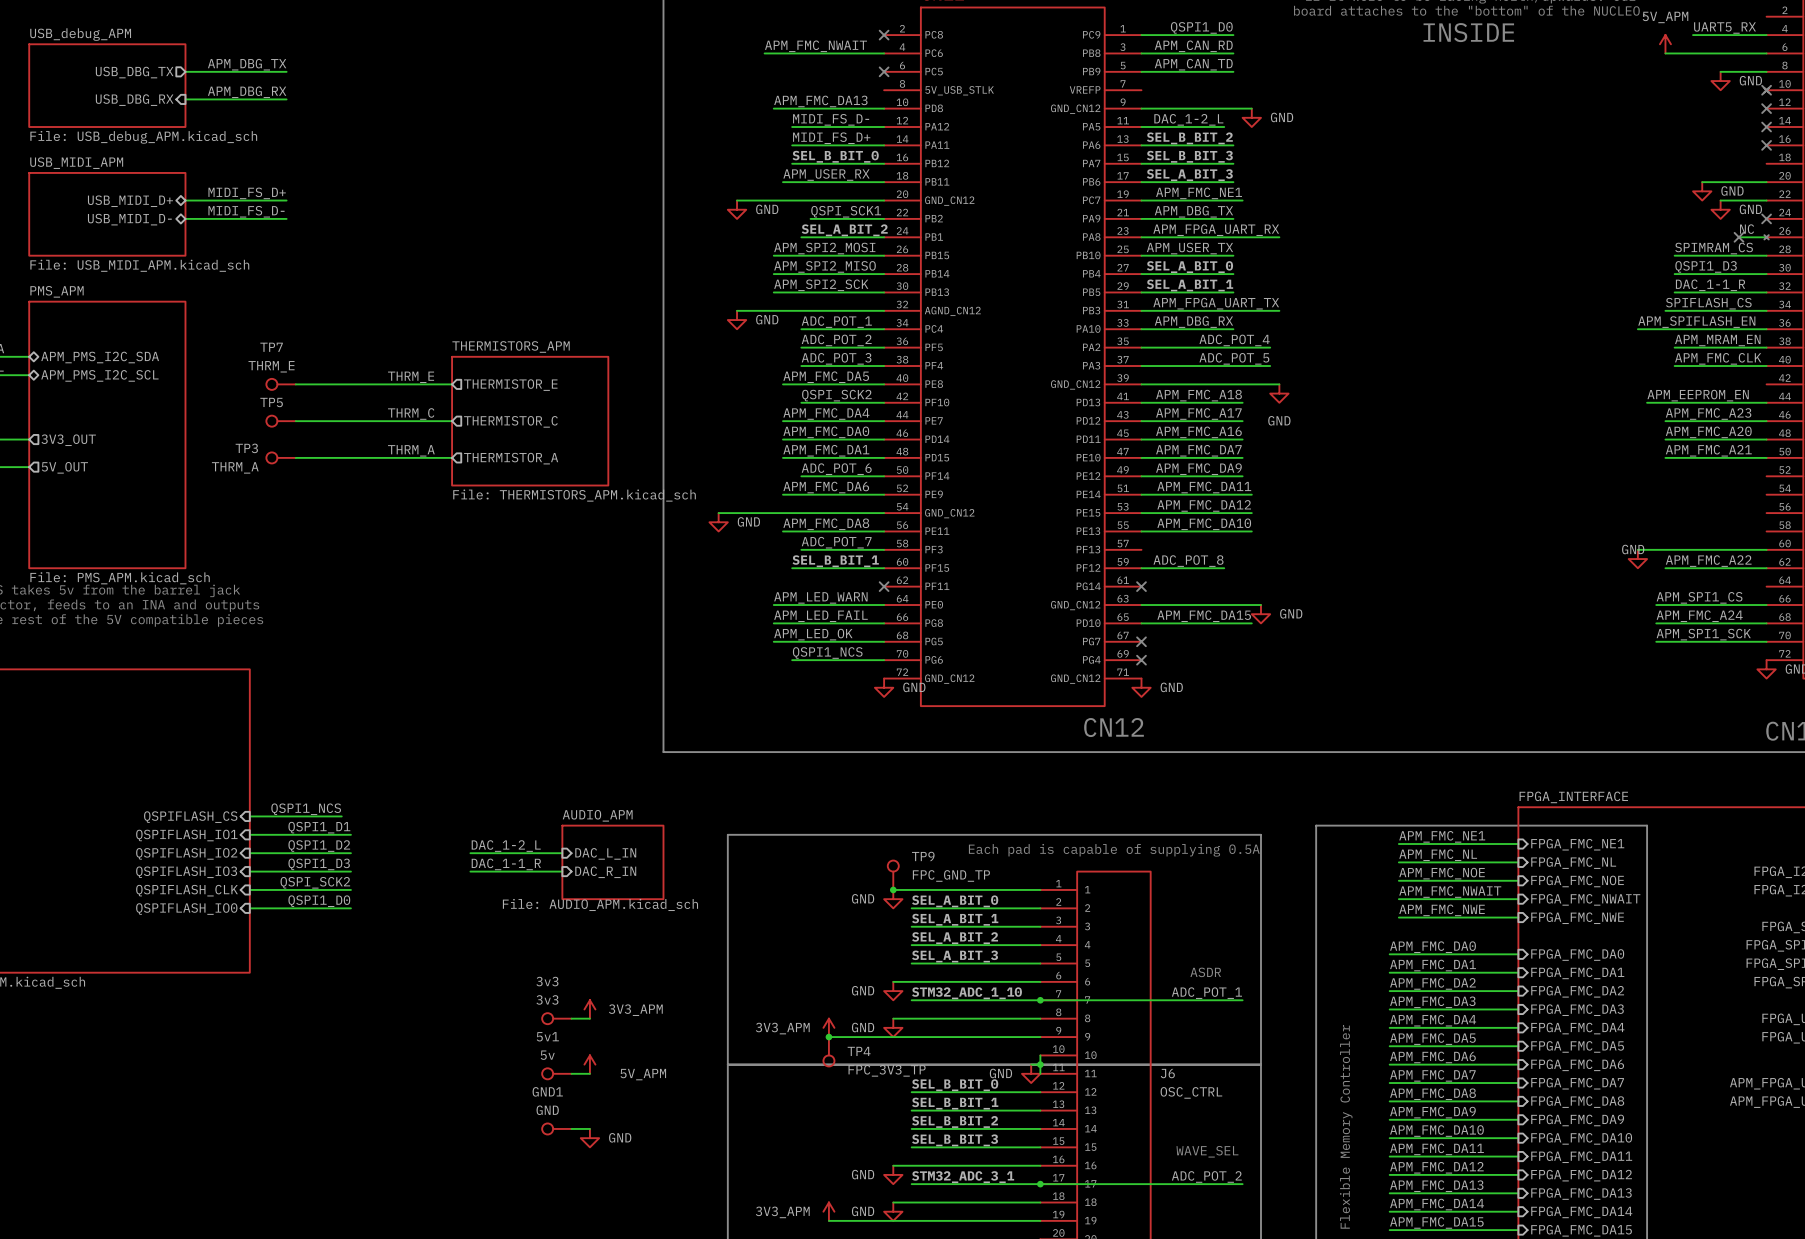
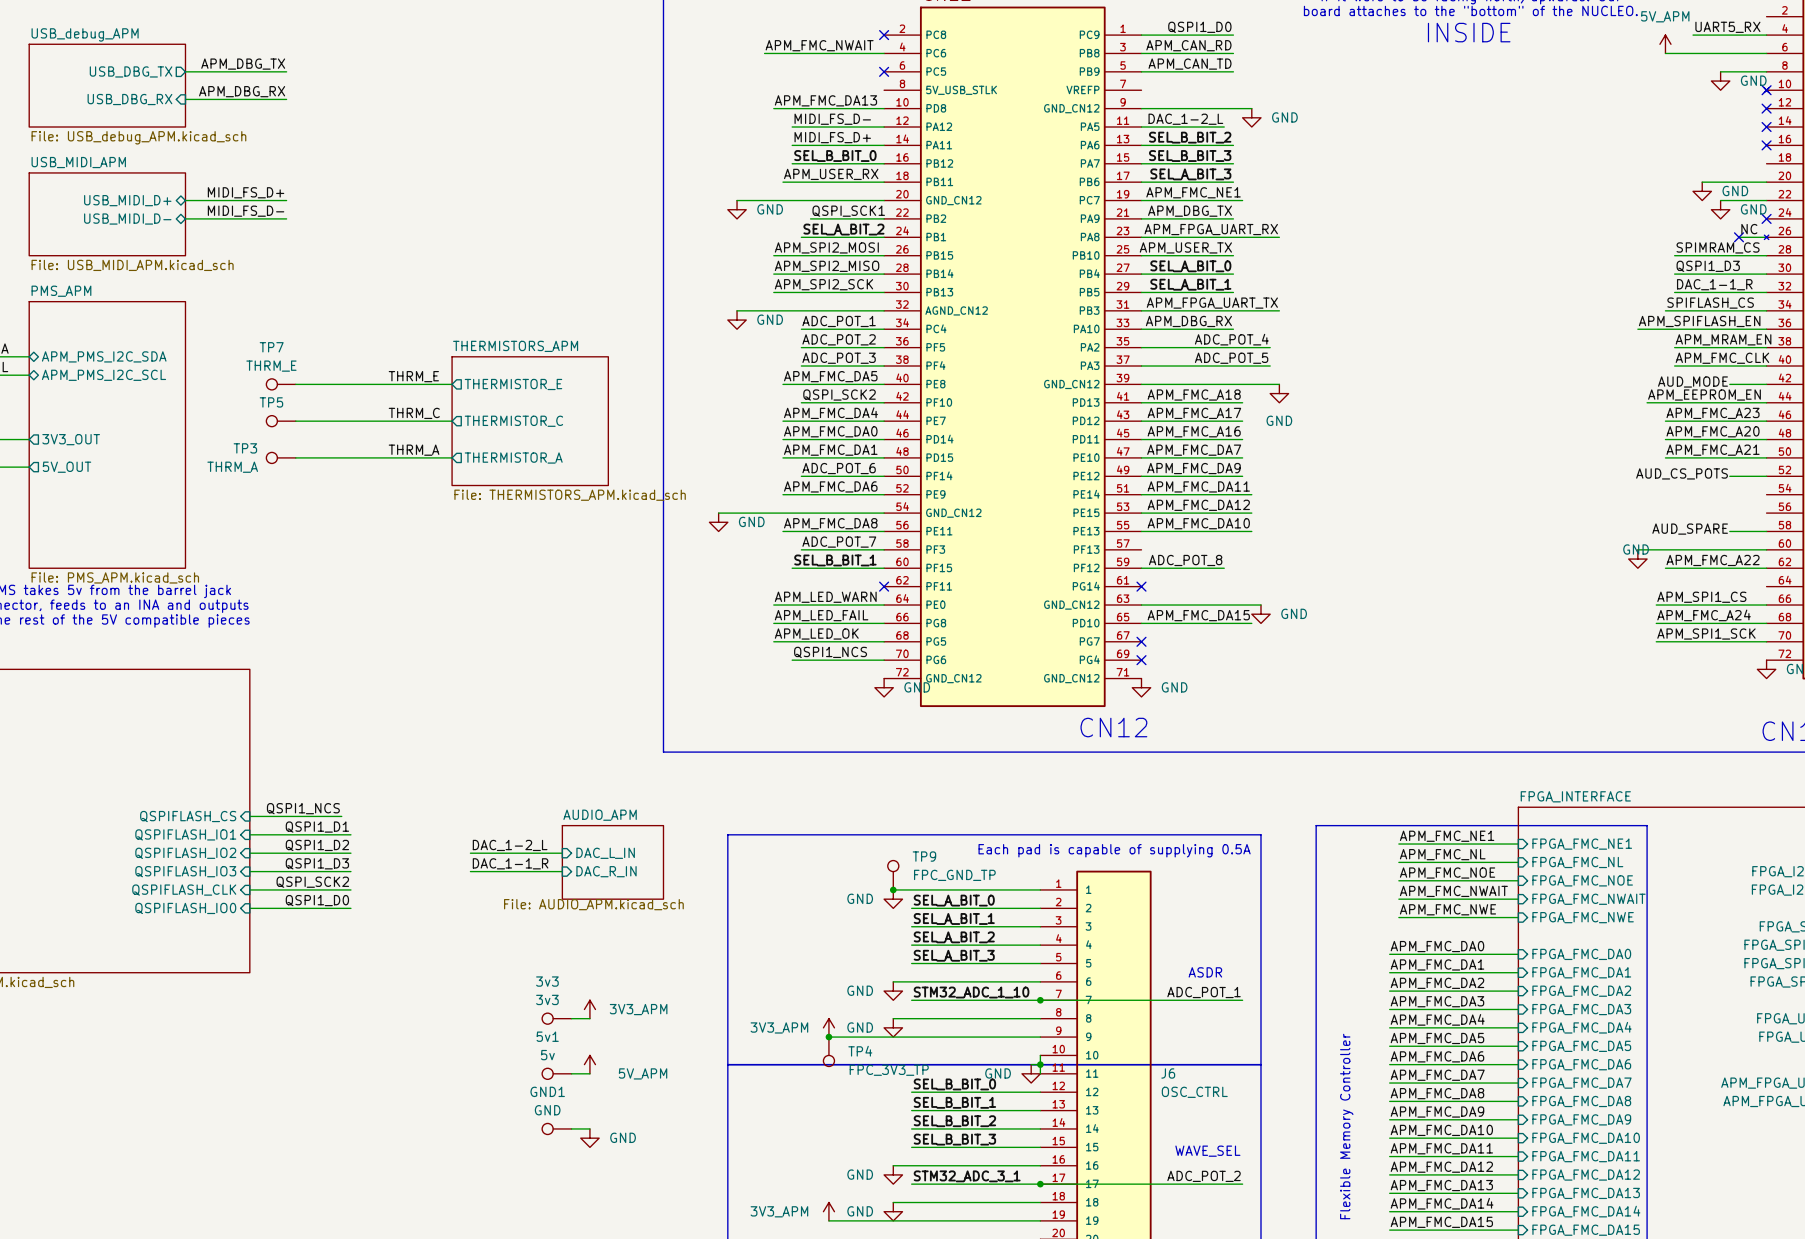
label: none -> AUD_MODE (1692, 382)
wire: none -> (1729, 384) (1766, 384)
label: none -> AUD_CS_POTS (1682, 473)
wire: none -> (1729, 476) (1766, 476)
label: none -> AUD_SPARE (1690, 529)
wire: none -> (1729, 531) (1766, 531)

